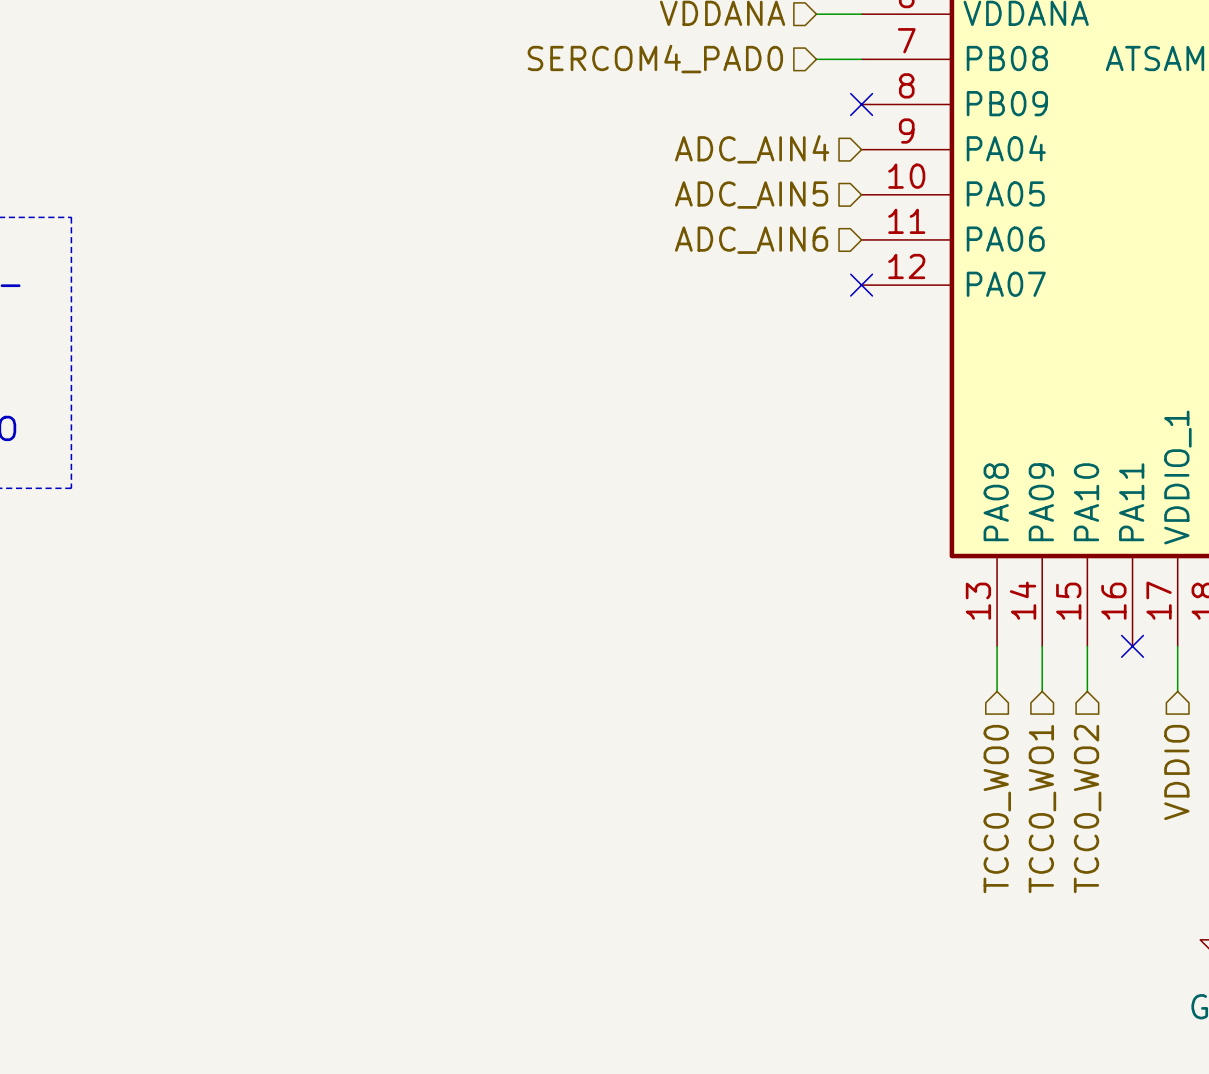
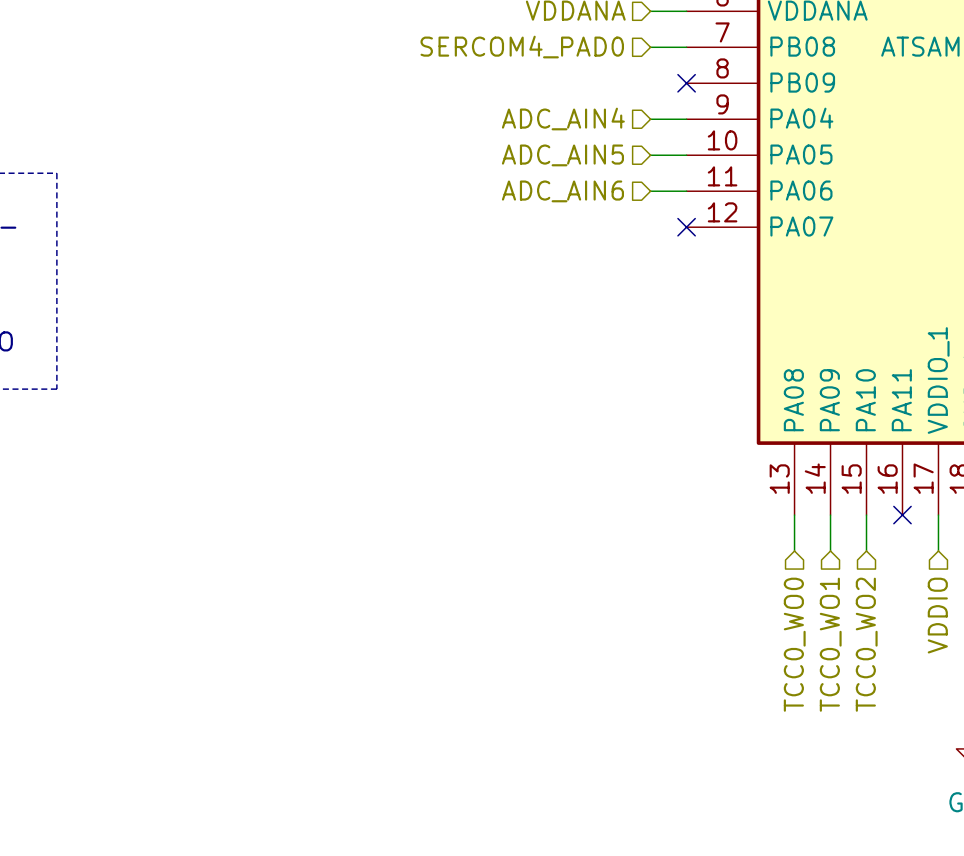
hierarchical label position: ADC_AIN4 (752, 149) -> ADC_AIN4 (563, 119)
wire: none -> (650, 119) (686, 119)
wire: none -> (650, 155) (686, 155)
hierarchical label position: ADC_AIN5 (751, 195) -> ADC_AIN5 (562, 155)
wire: none -> (650, 191) (686, 191)
hierarchical label position: ADC_AIN6 (751, 240) -> ADC_AIN6 (562, 191)

